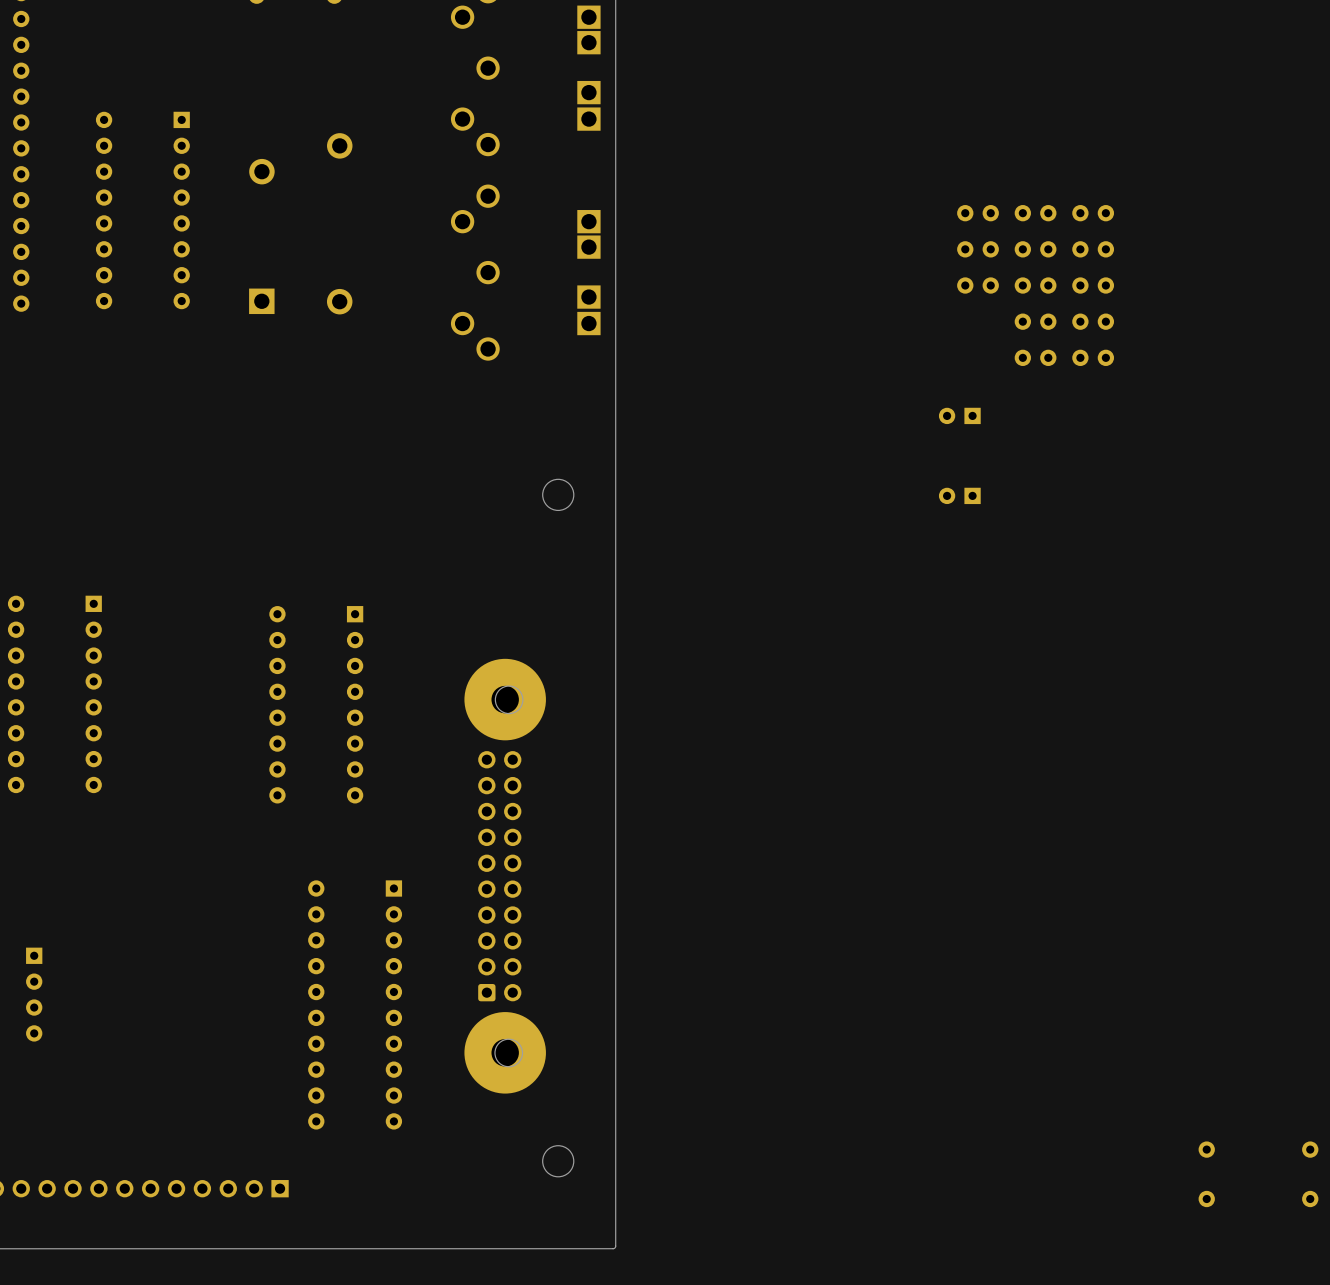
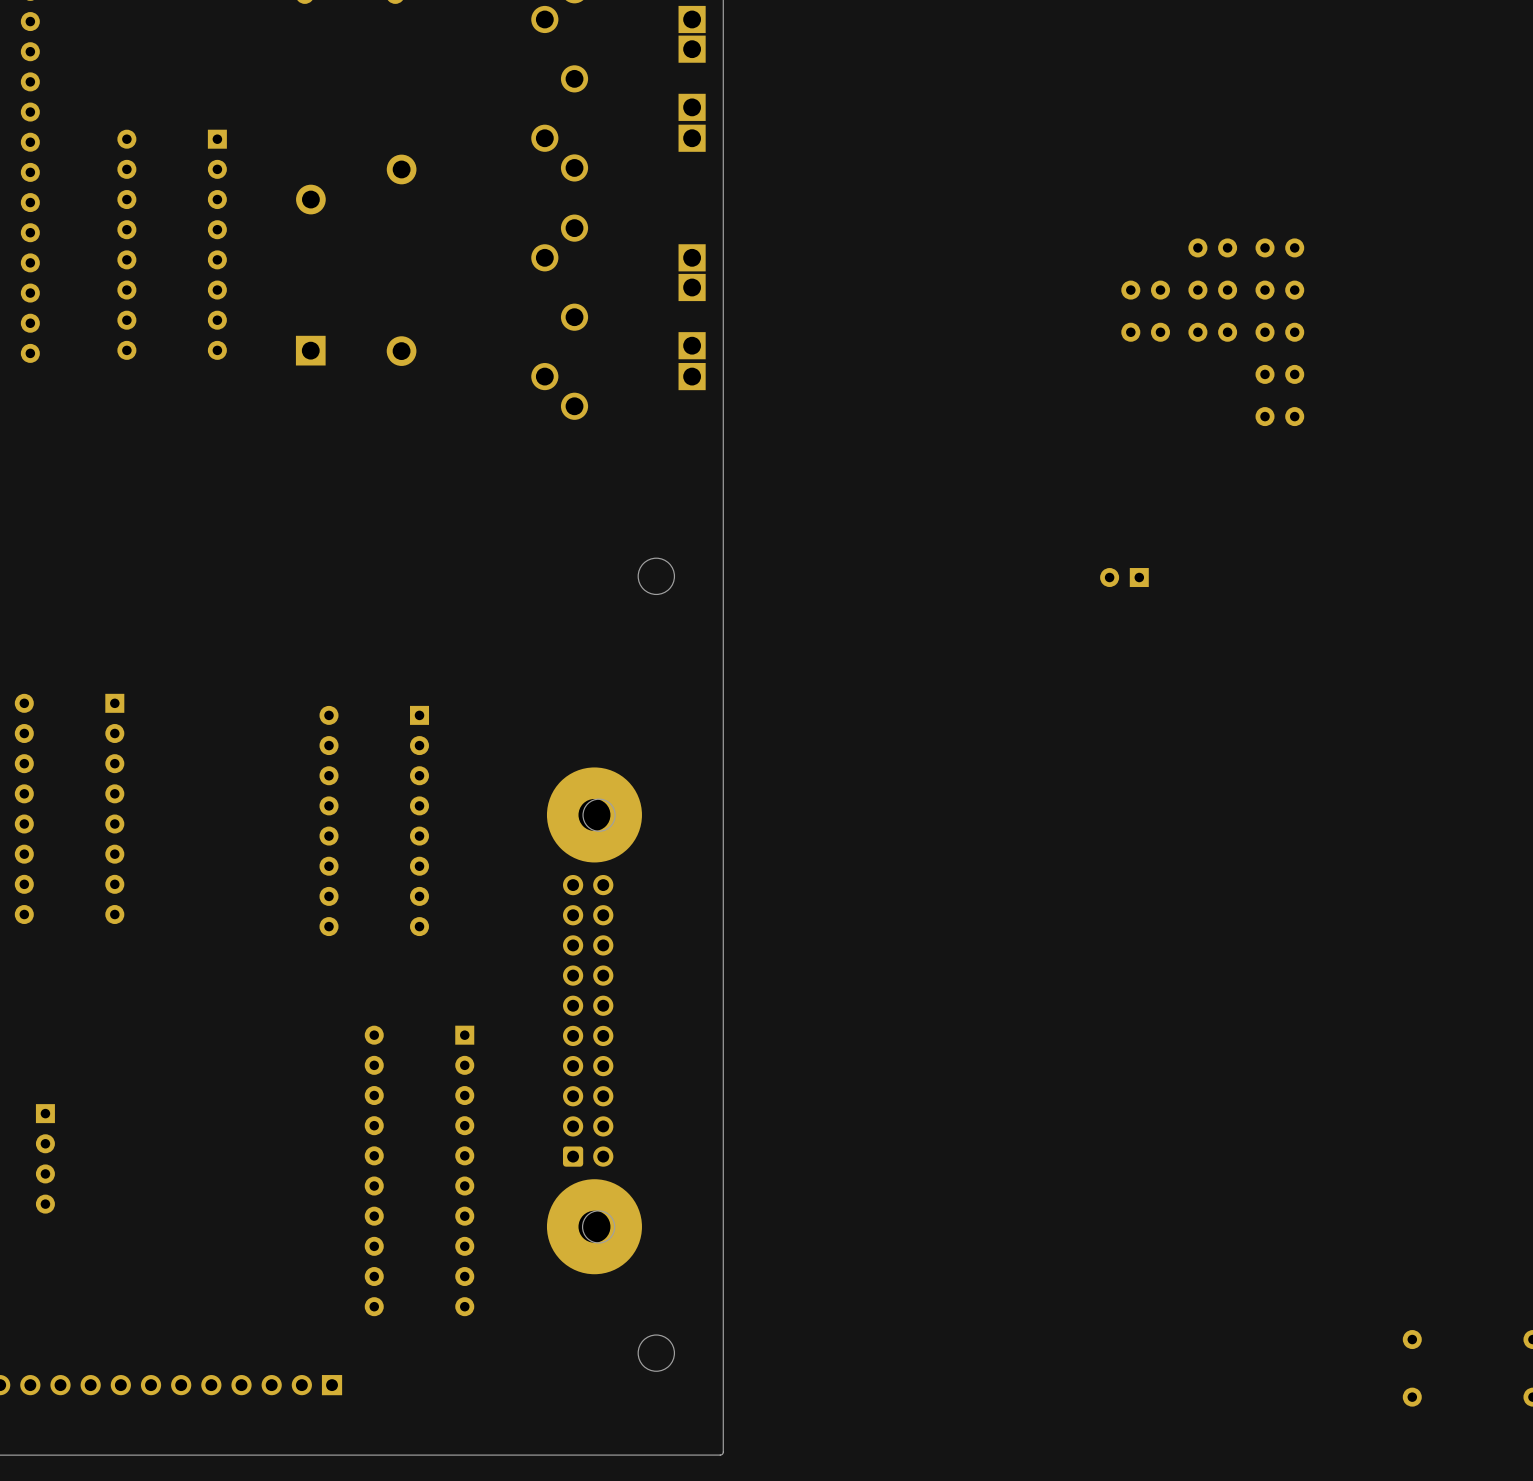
part: (978, 213) -> none
part: (1035, 321) -> none
part: (1035, 357) -> none
part: (959, 415) -> none

